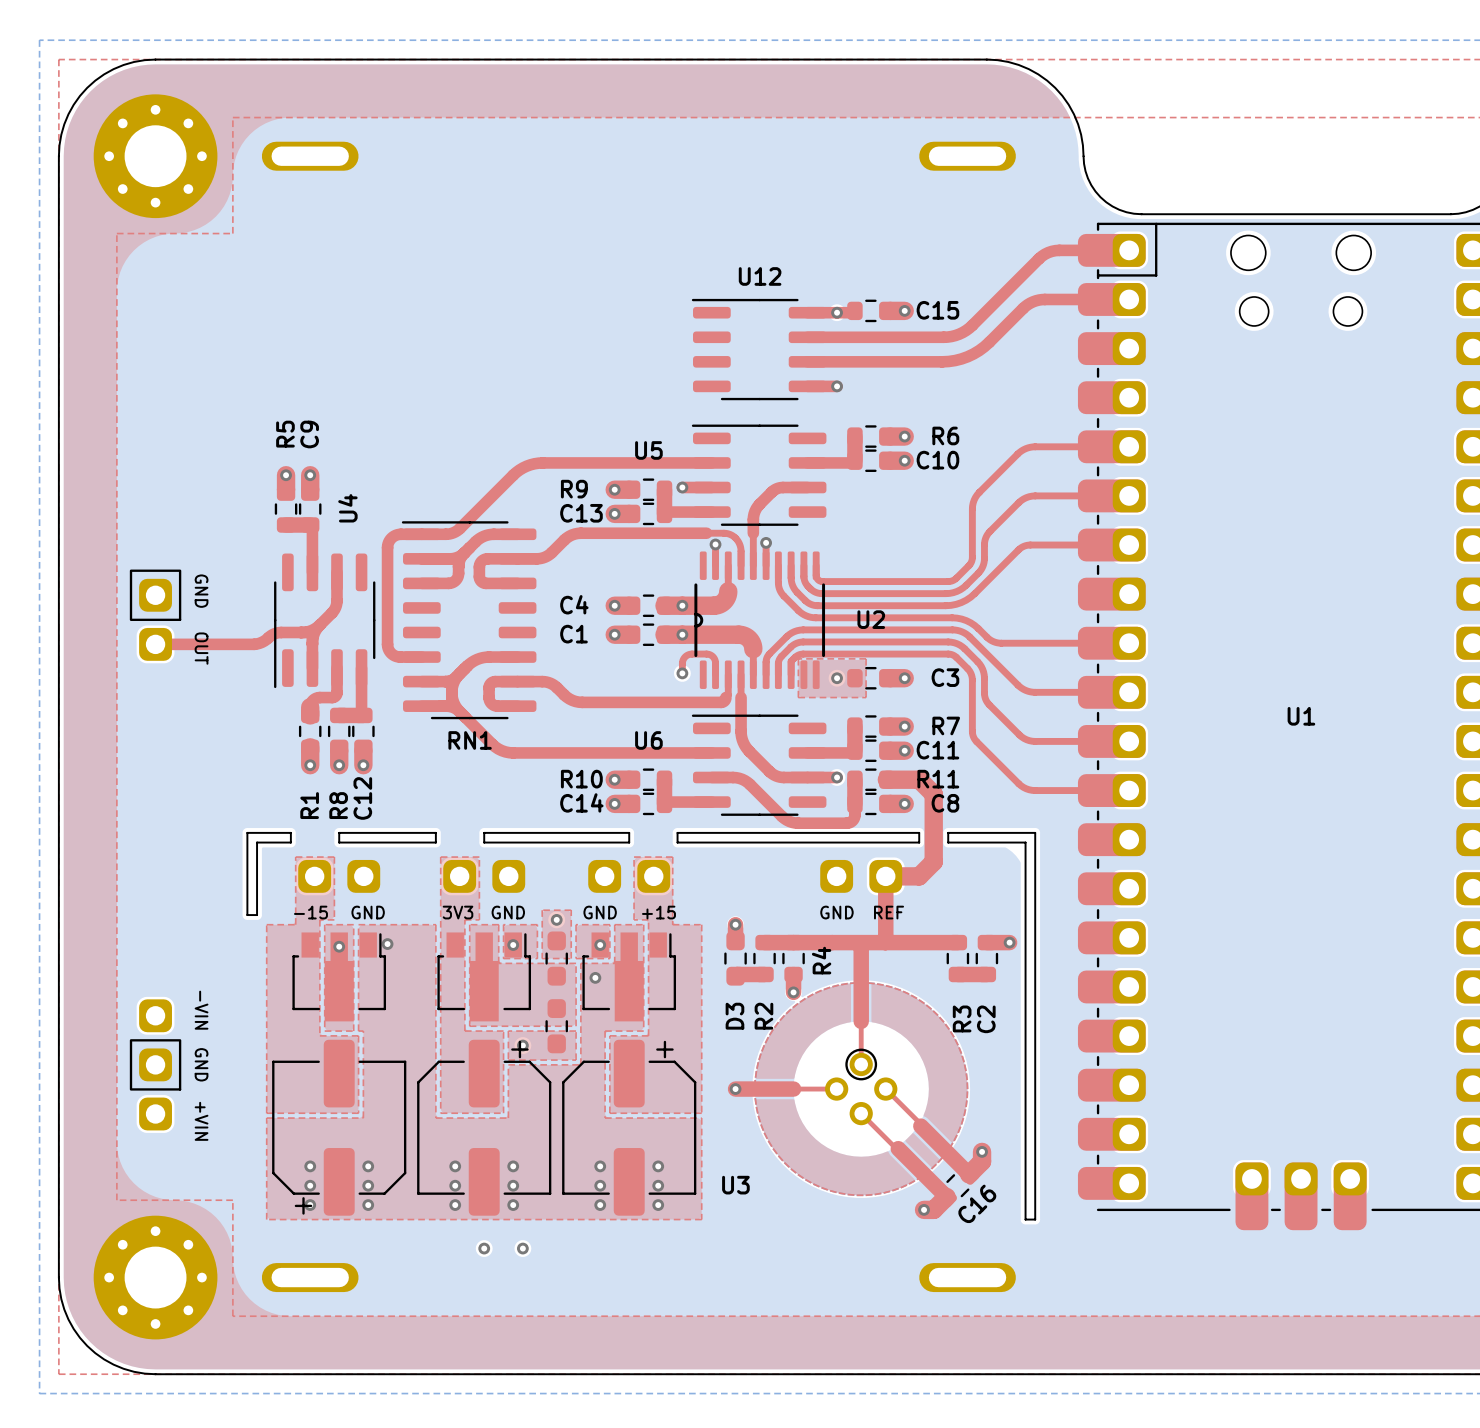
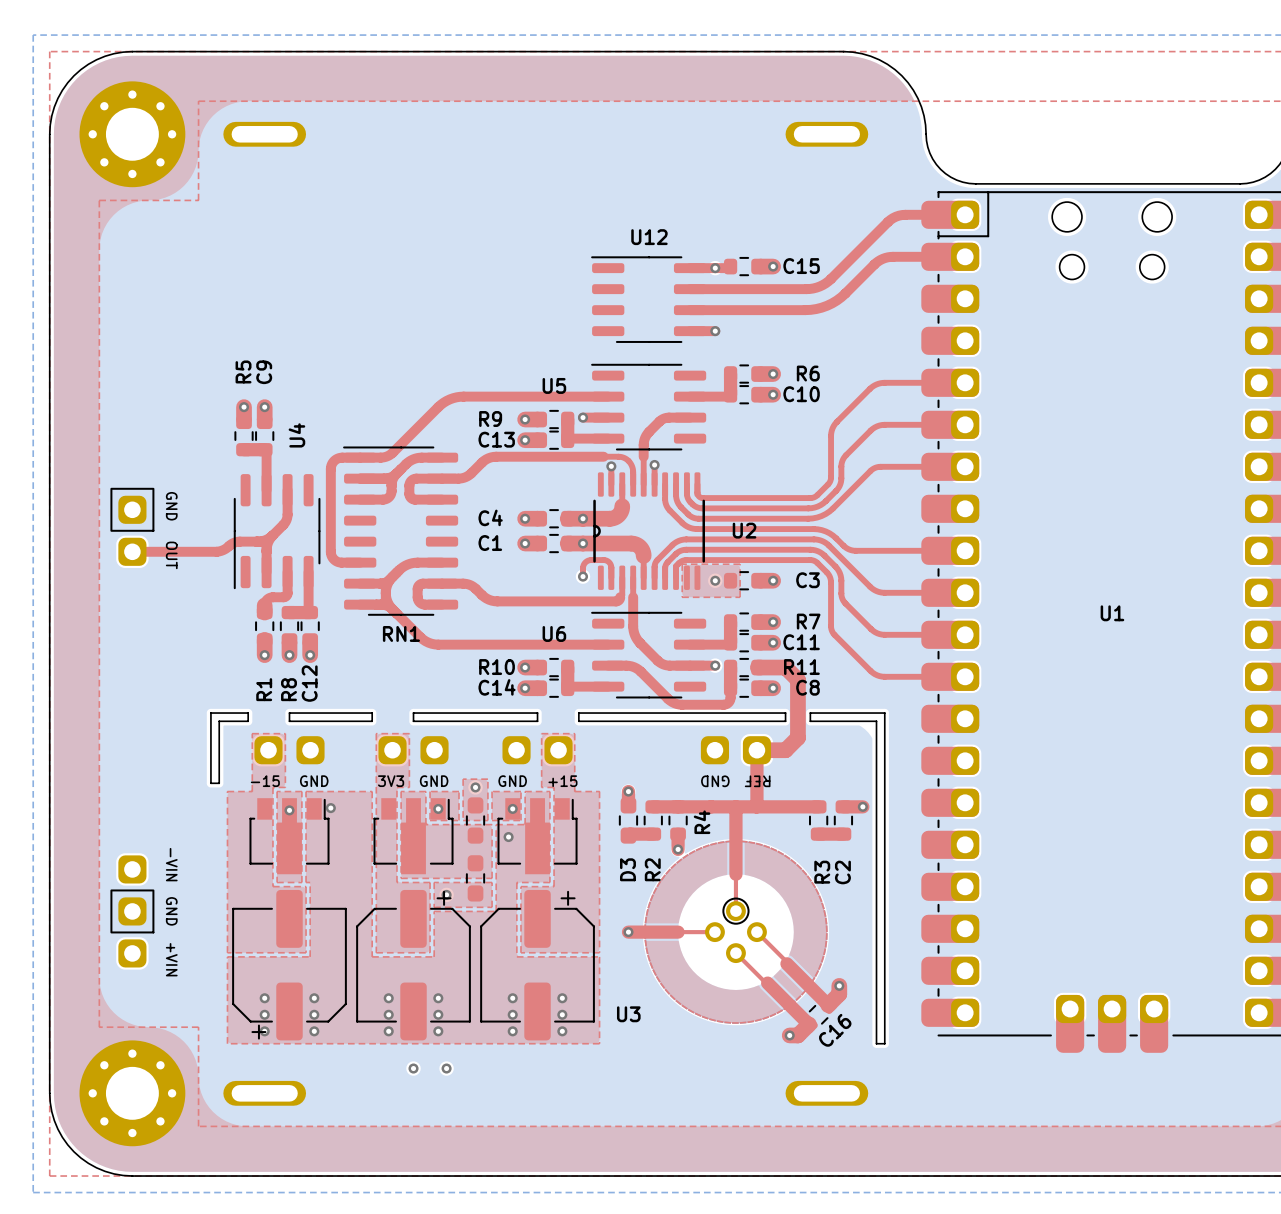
text rotation: 0° (836, 912) -> 180° (715, 781)
part value rotation: 0° (889, 912) -> 180° (757, 781)

